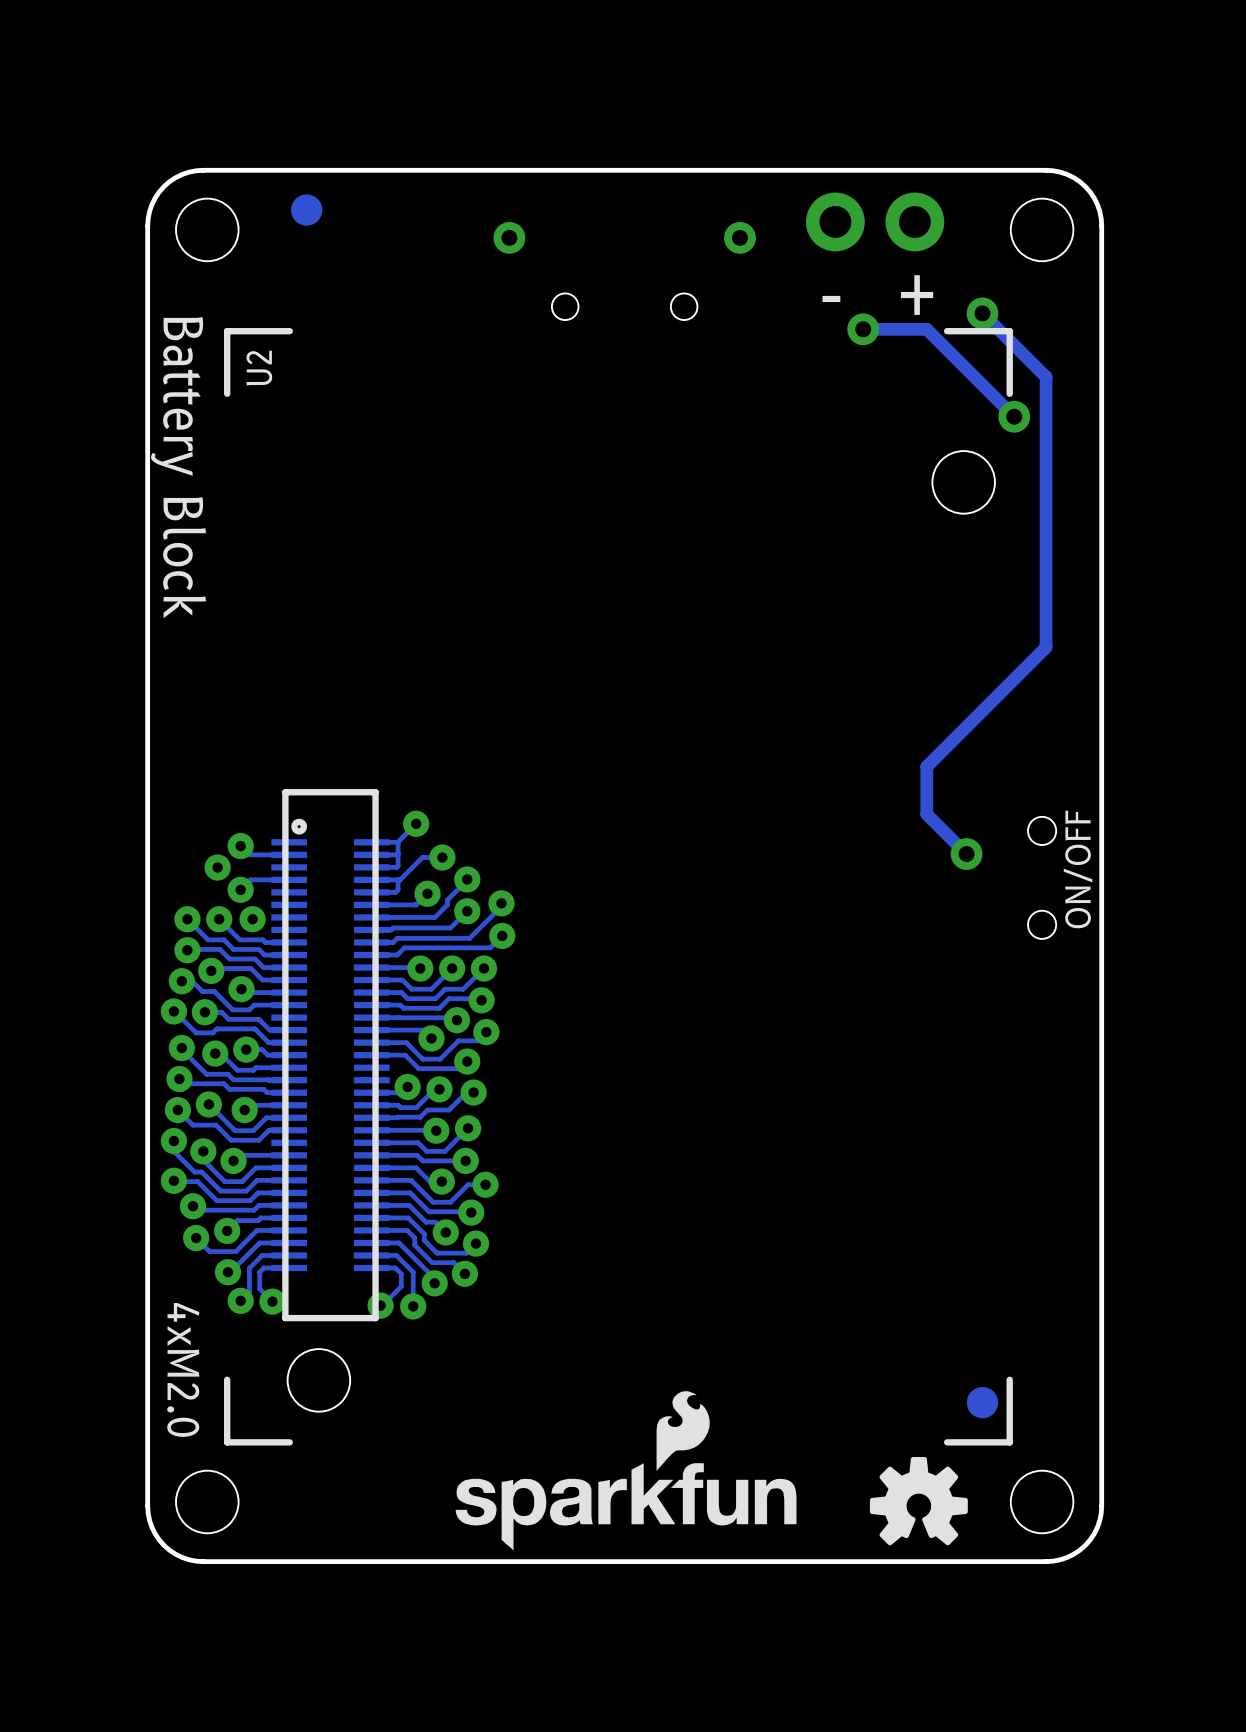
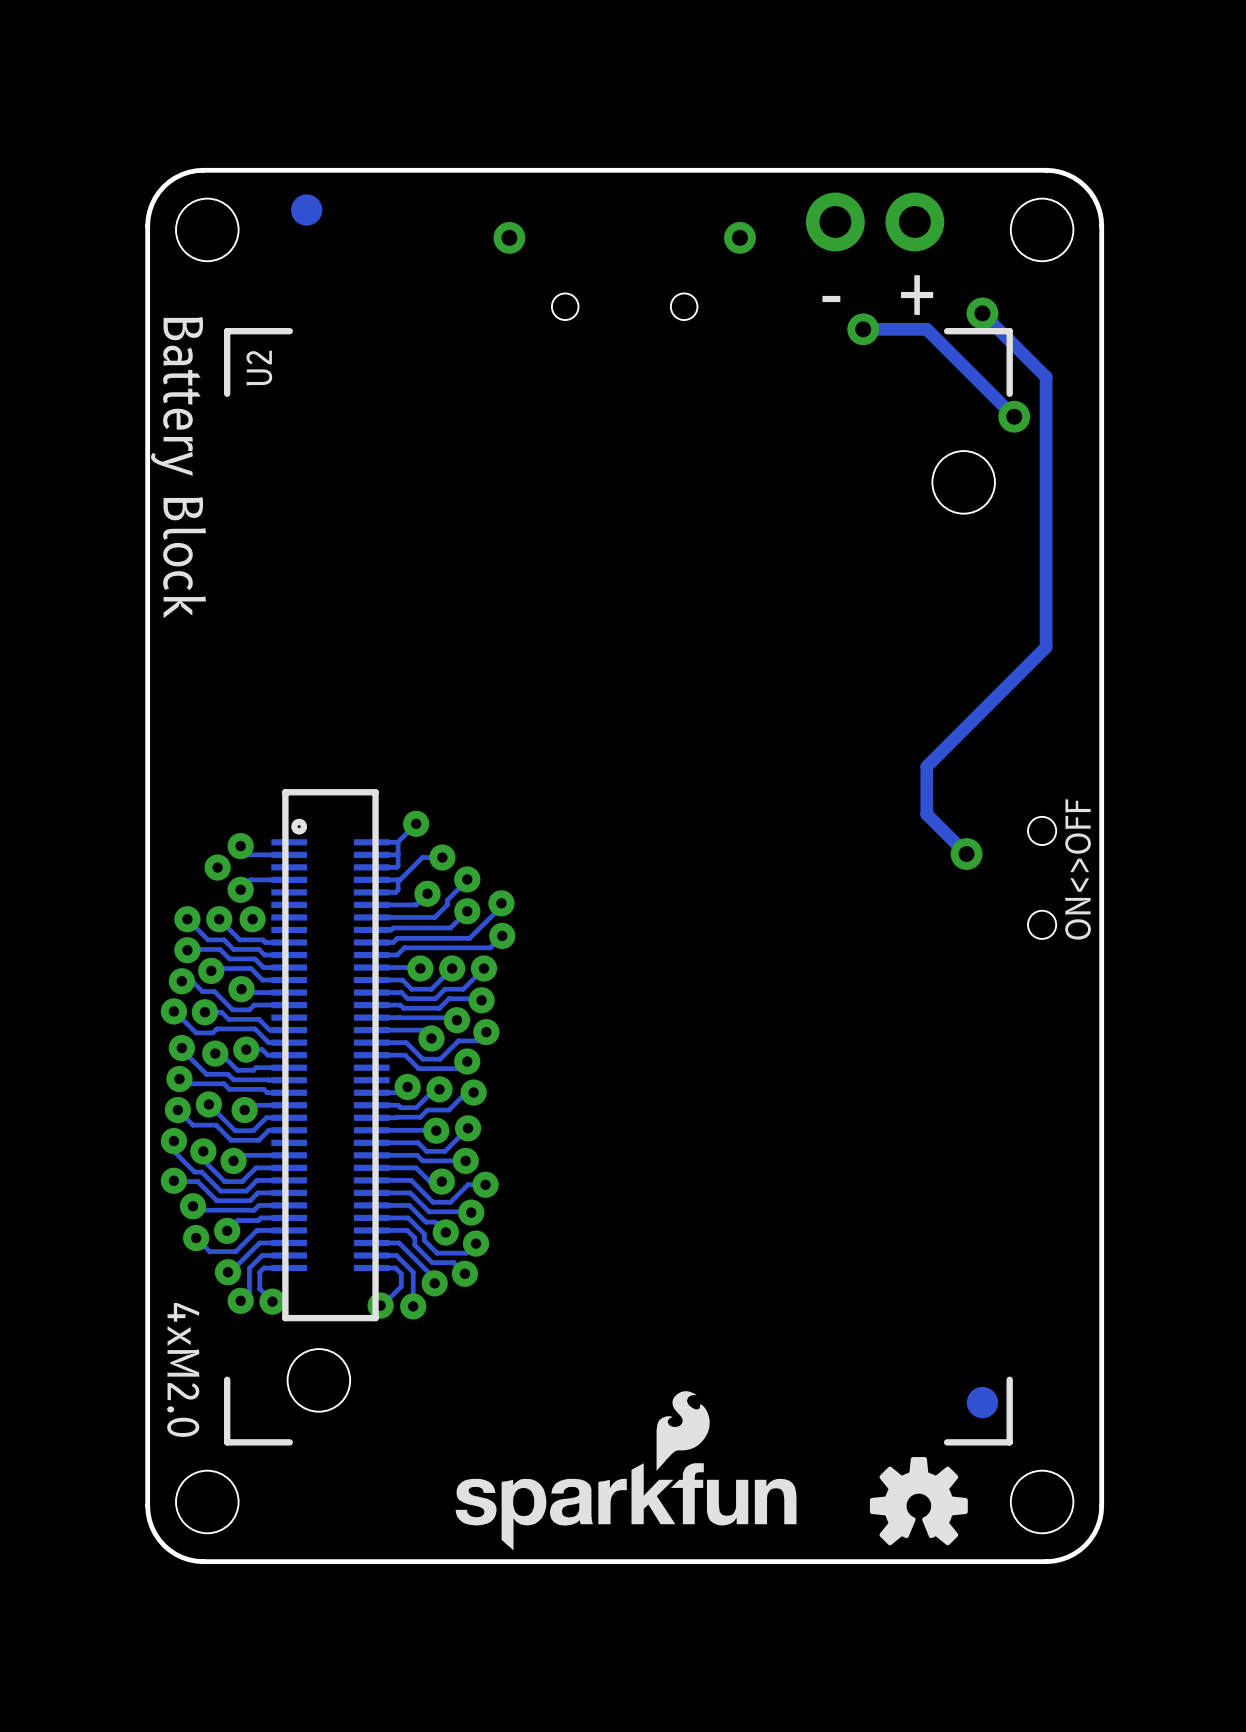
text: ON/OFF (1078, 869) -> ON<>OFF (1078, 869)

